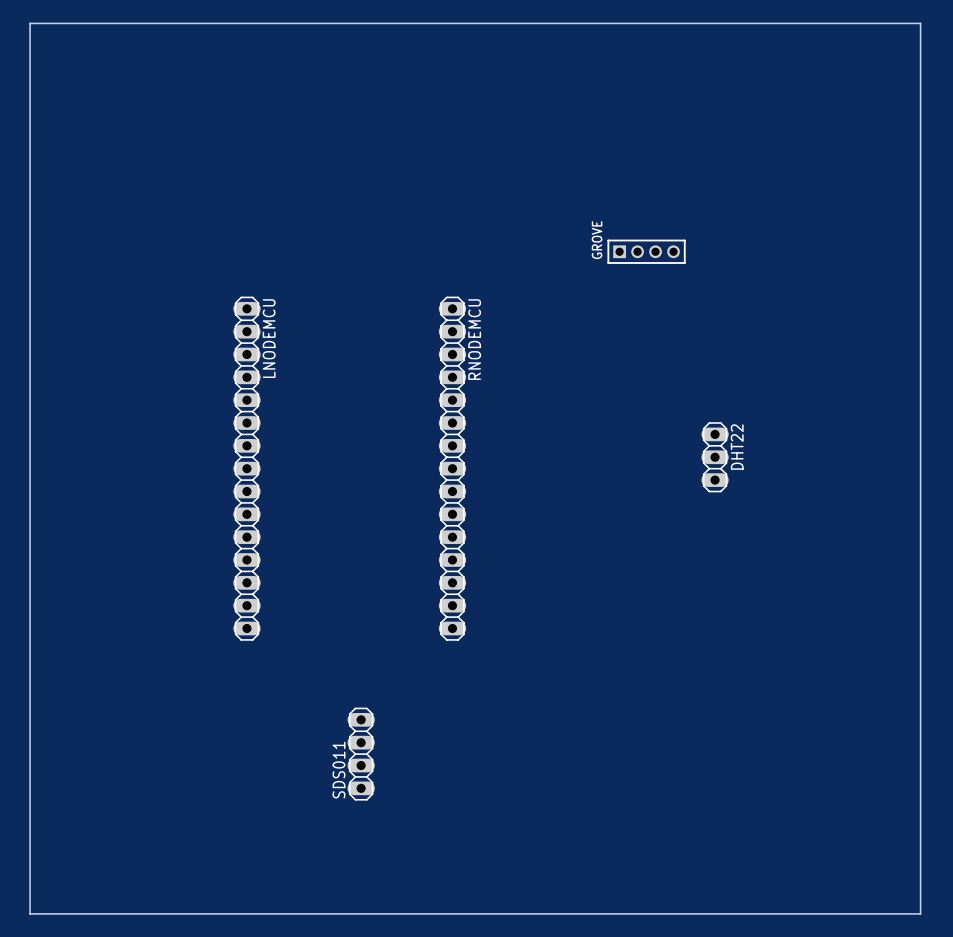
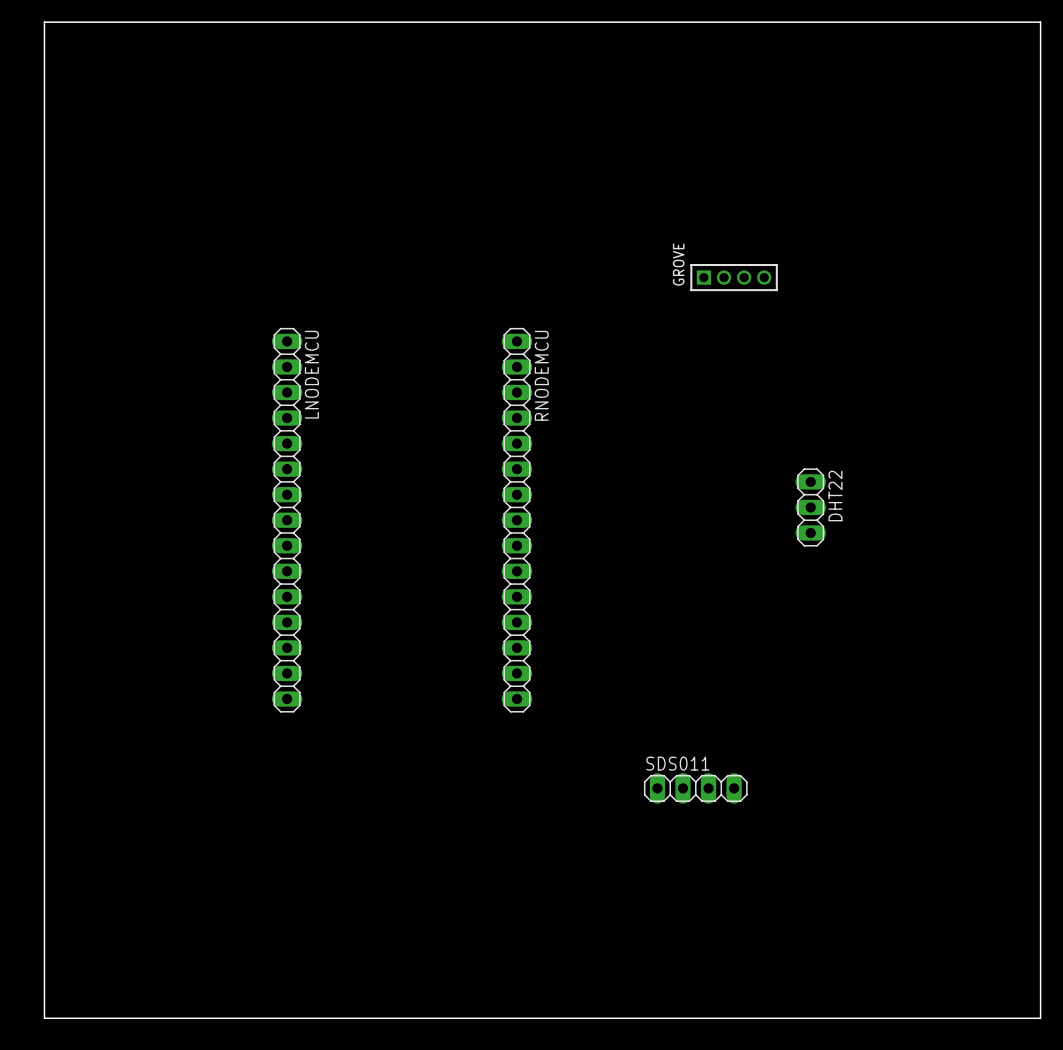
SDS011 rotation: 0° (361, 754) -> 90° clockwise (695, 788)
SDS011 position: (361, 754) -> (695, 788)

